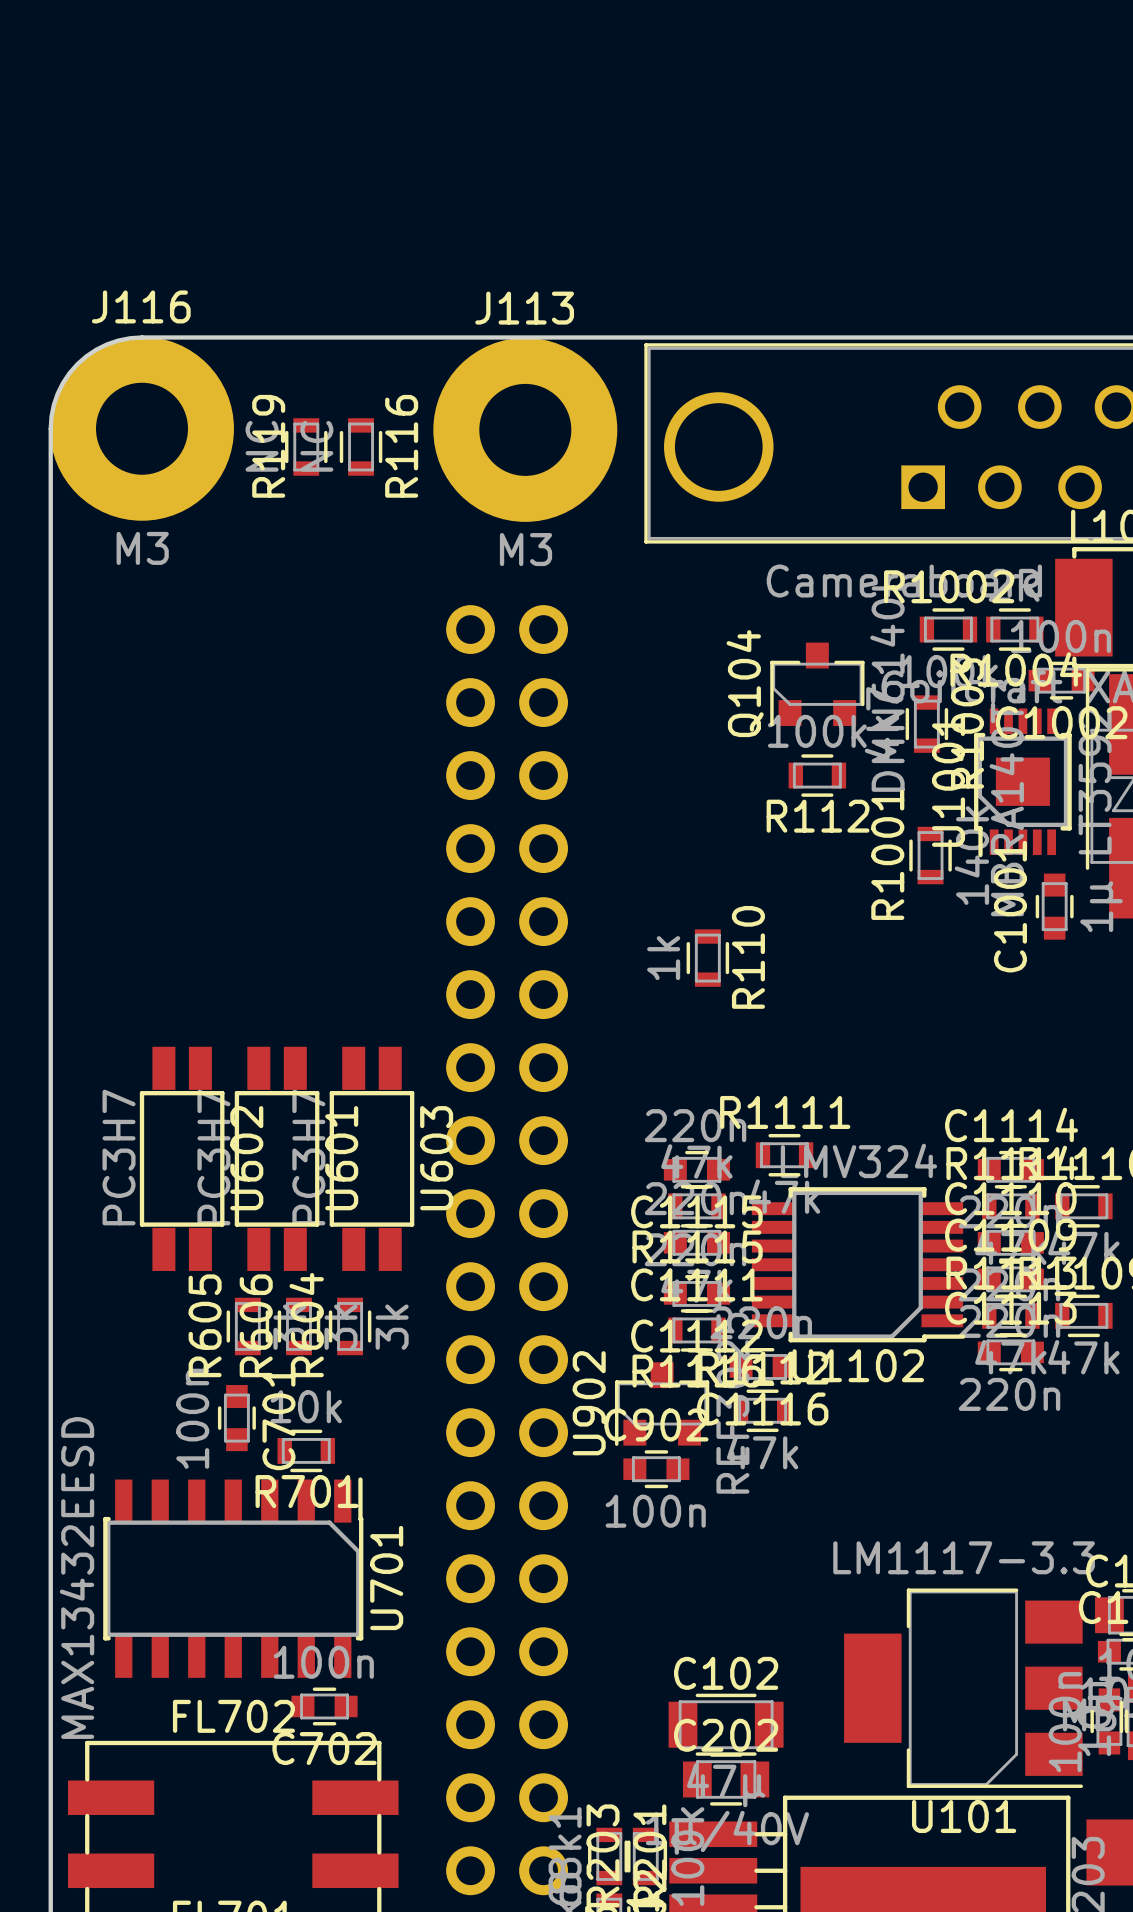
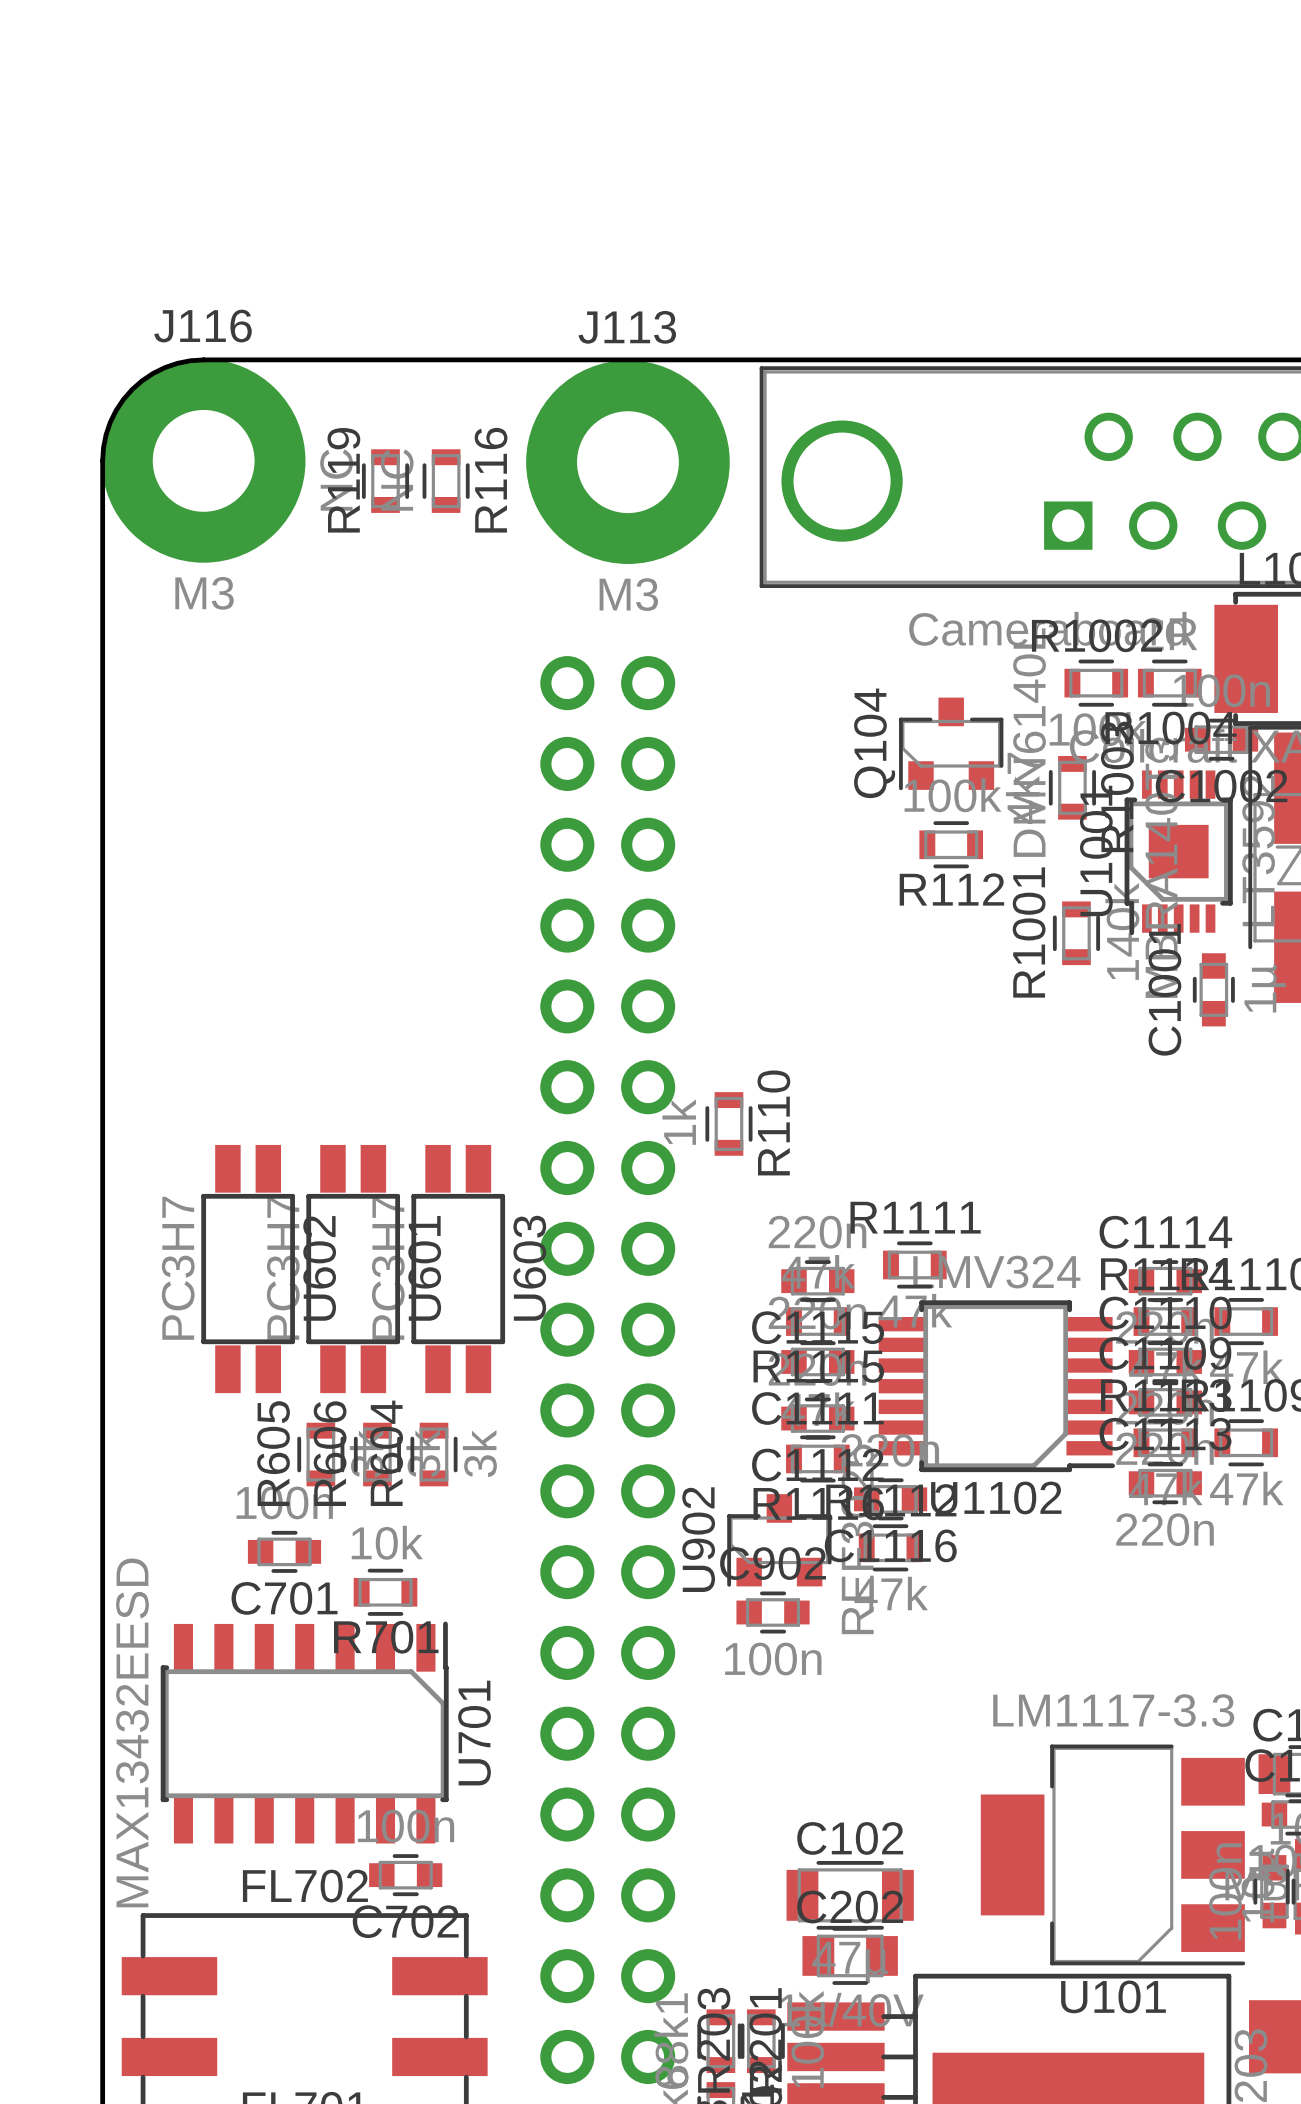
R110 position: (707, 958) -> (728, 1123)
C701 rotation: 0° (236, 1418) -> 90° clockwise (284, 1551)

